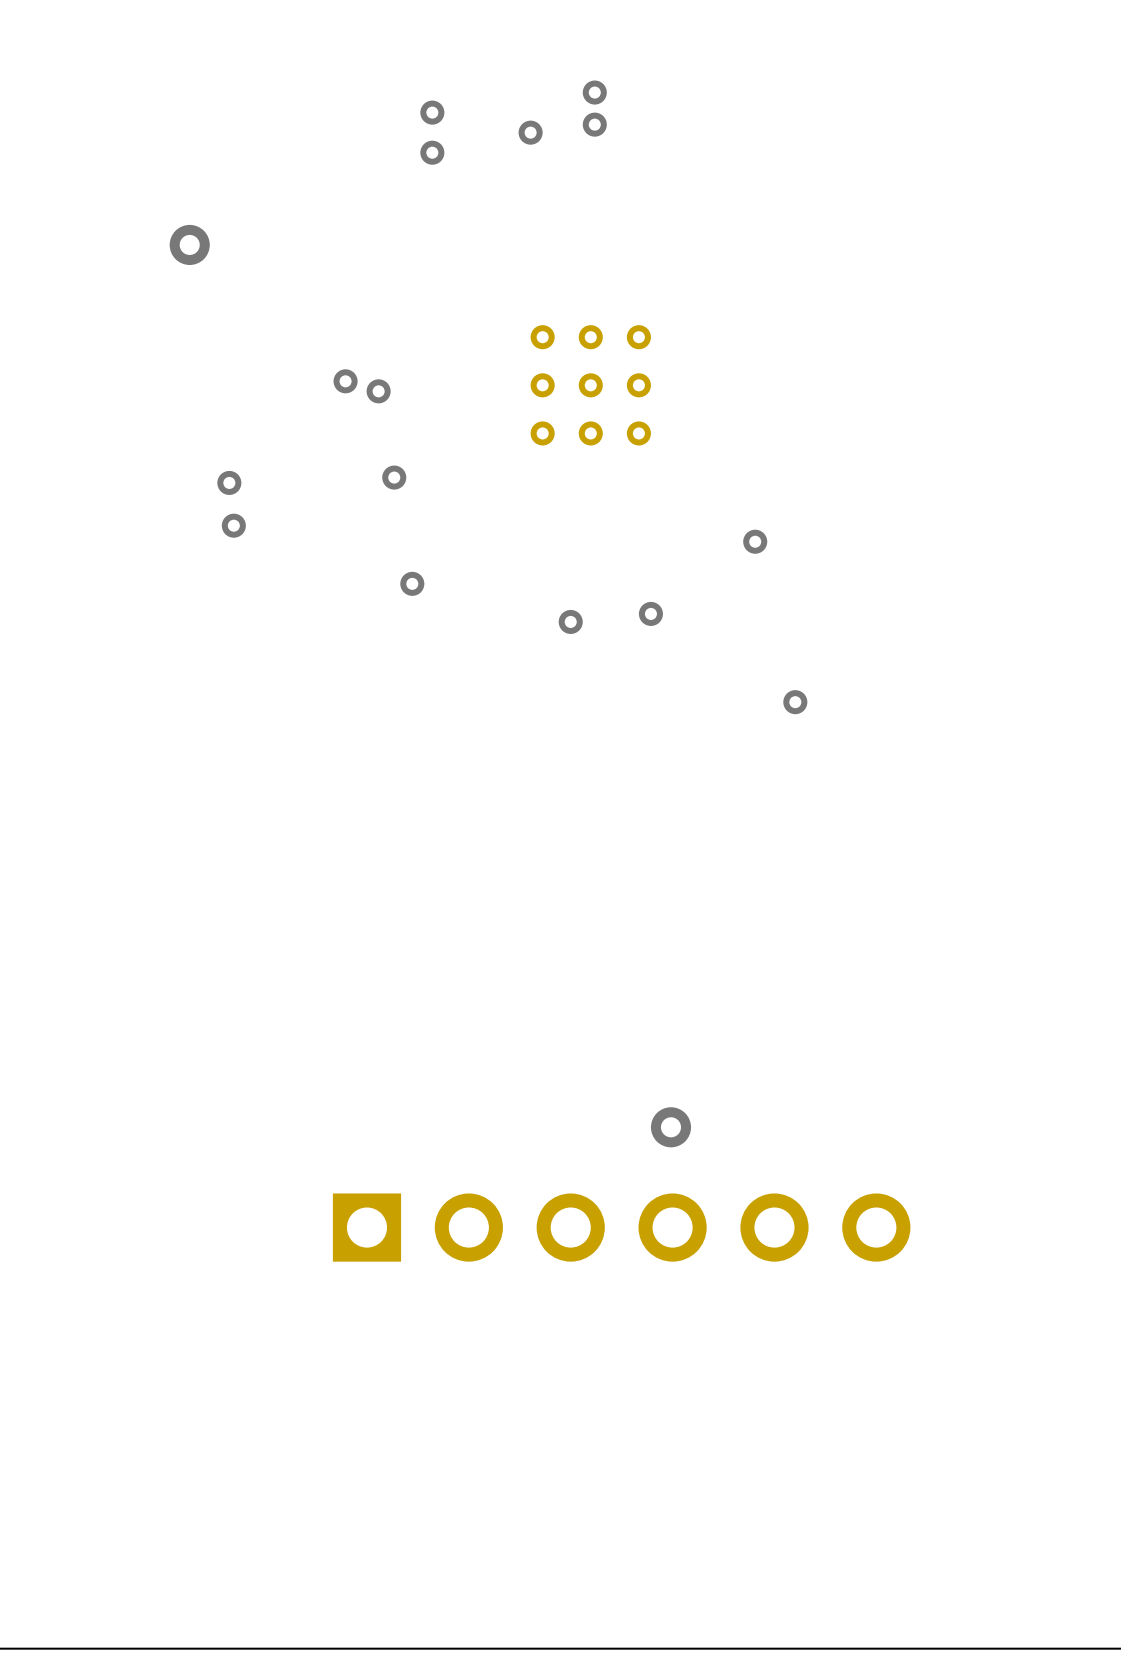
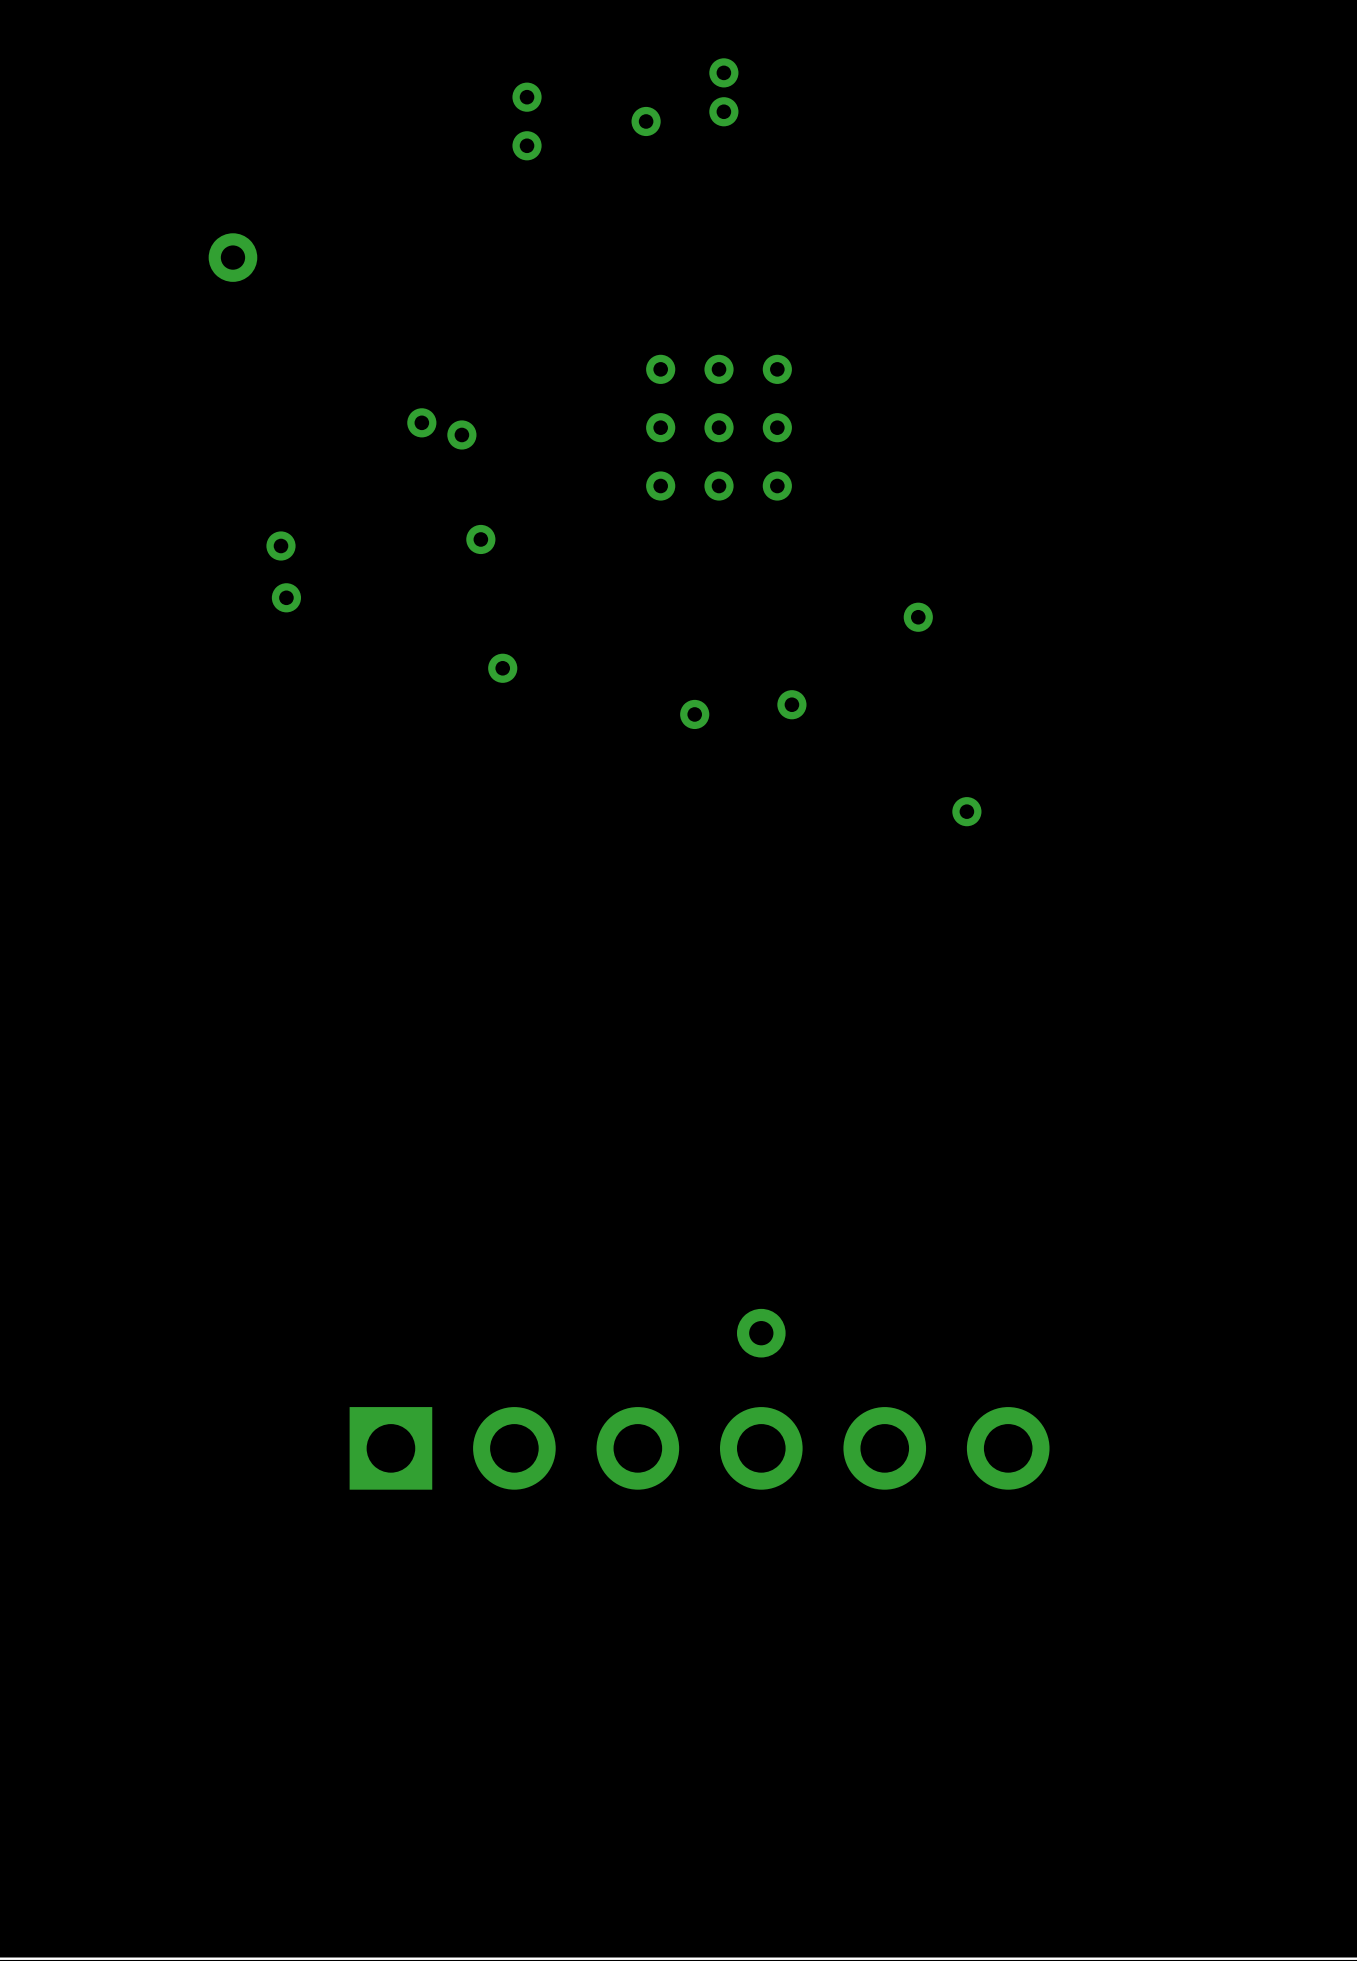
via position: (670, 1127) -> (761, 1333)
part position: (621, 1227) -> (699, 1448)

